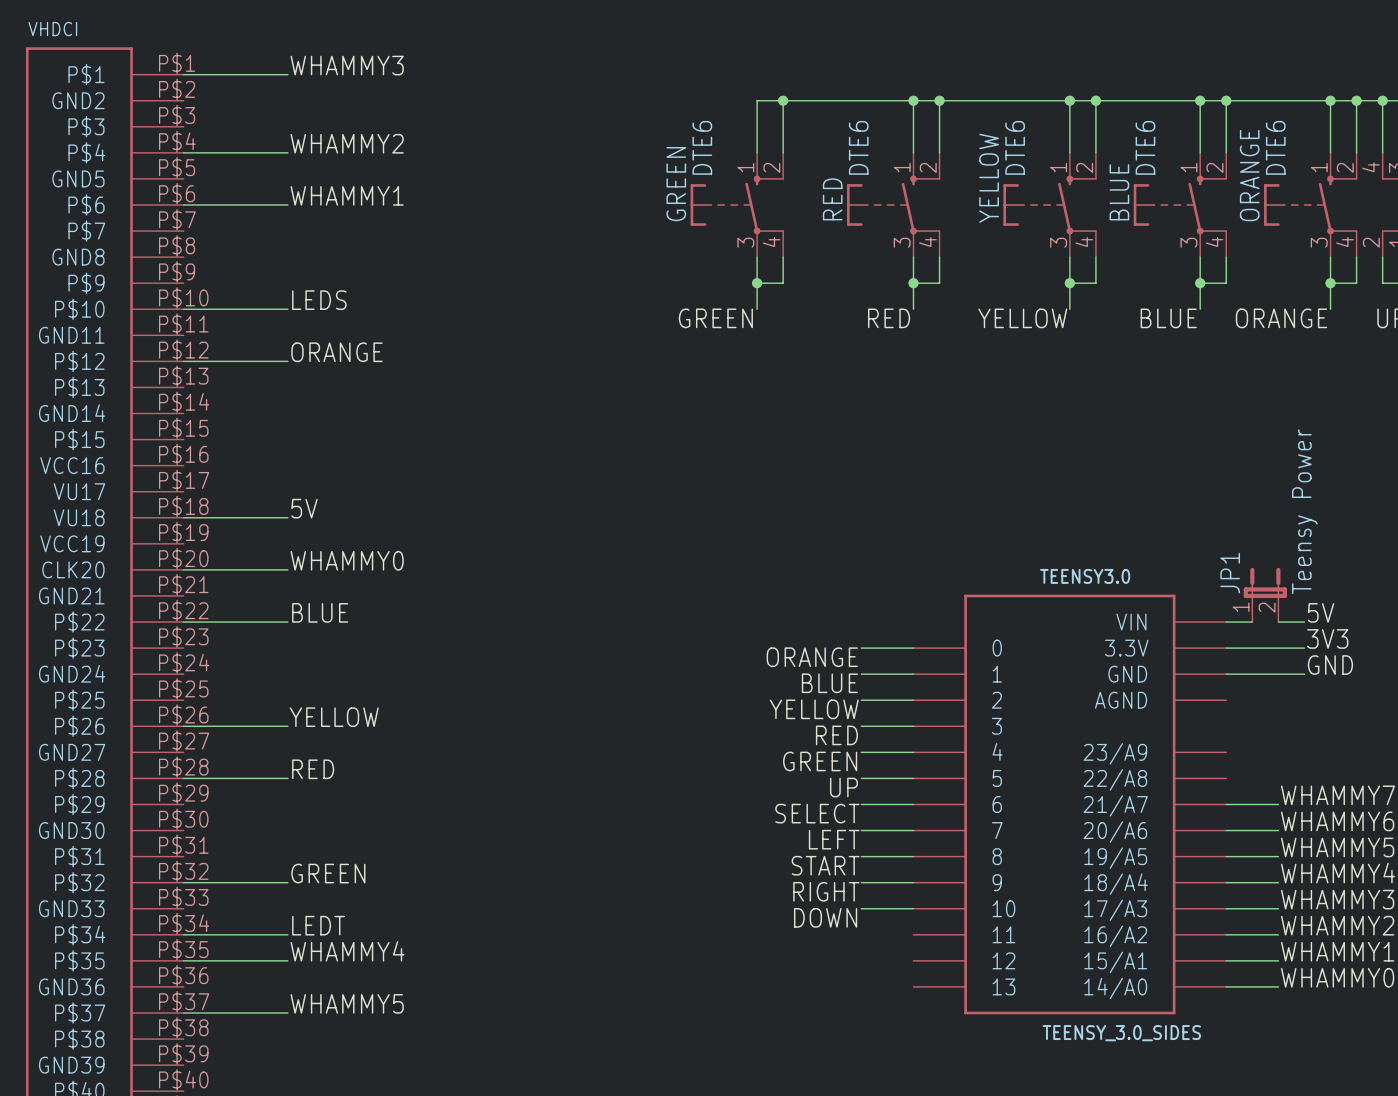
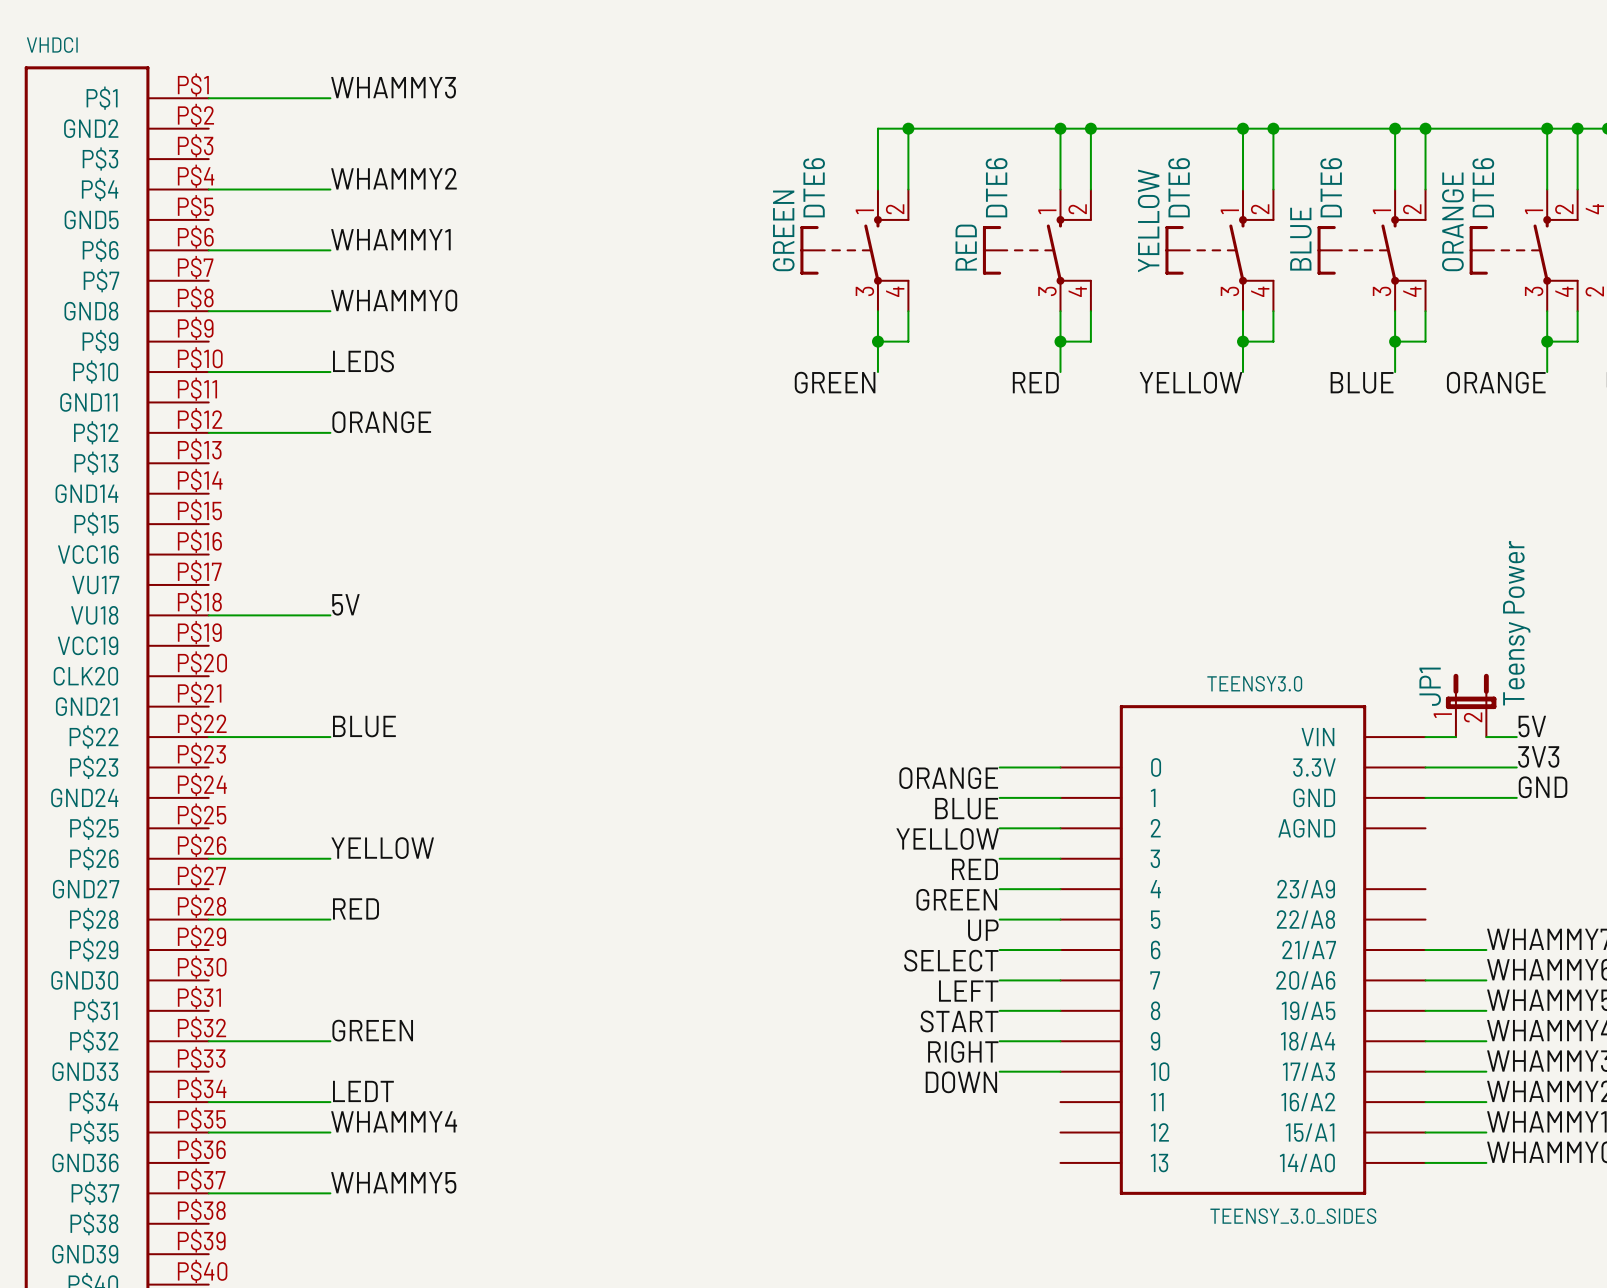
label: none -> WHAMMY0 (394, 300)
wire: none -> (208, 311) (330, 311)
label: WHAMMY0 (347, 560) -> none
wire: (183, 569) (287, 569) -> none

